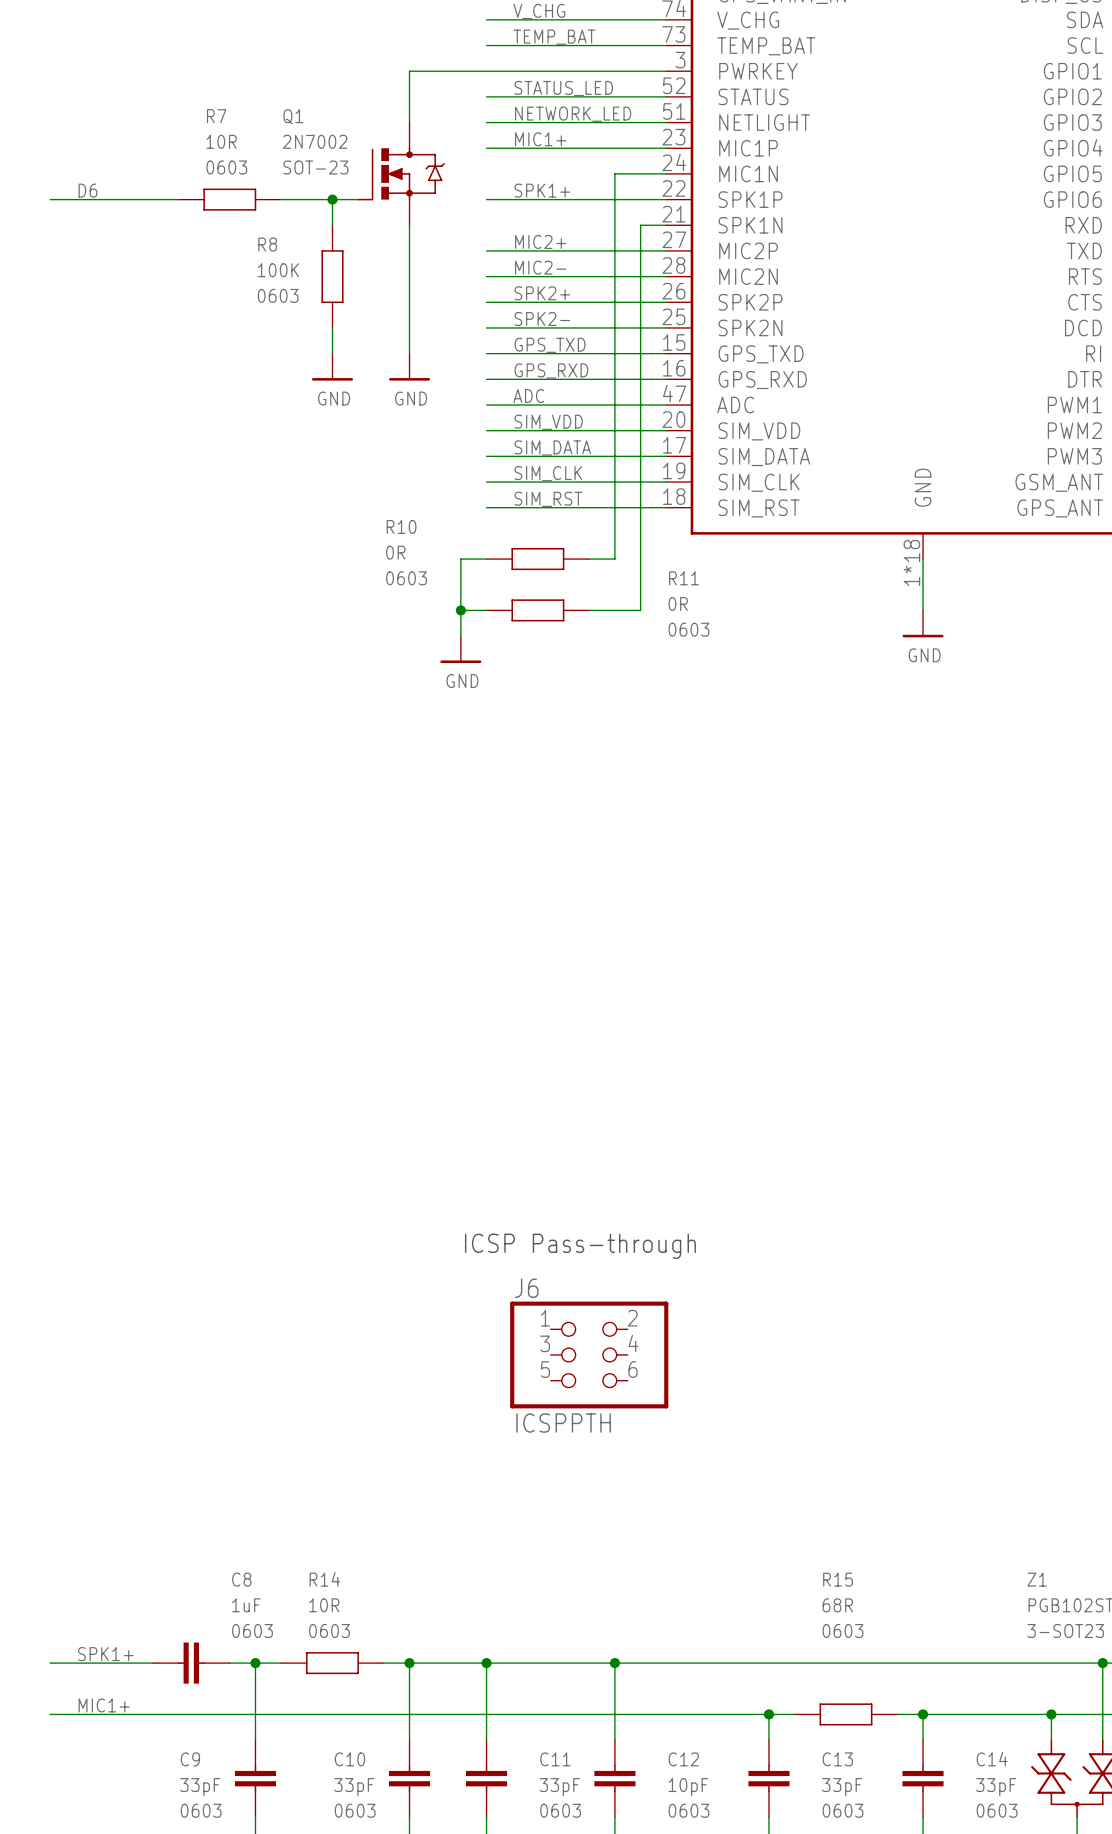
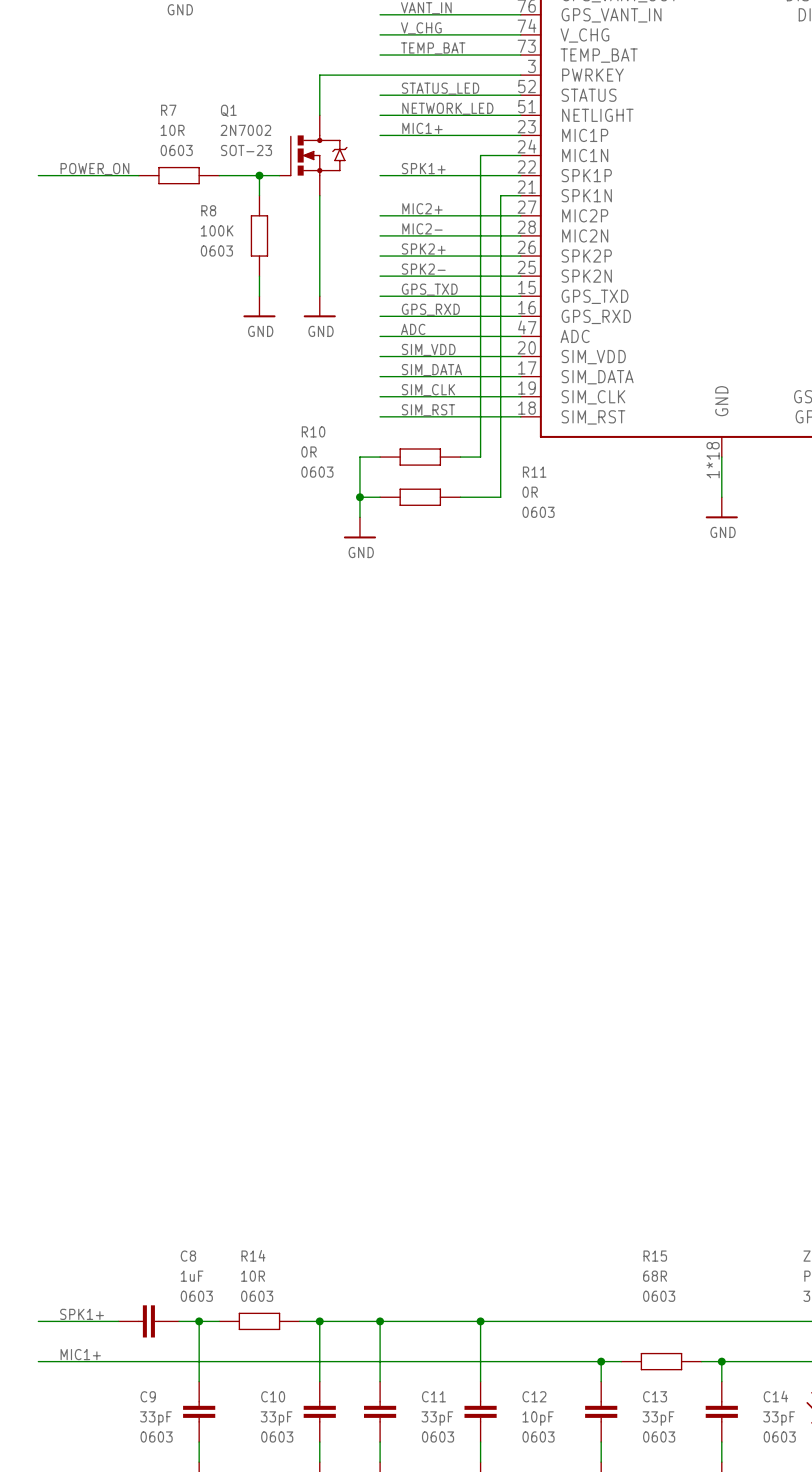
label: D6 (87, 190) -> POWER_ON (94, 169)
text: ICSP Pass-through (580, 1246) -> none
J6: ICSPPTH (589, 1354) -> none

